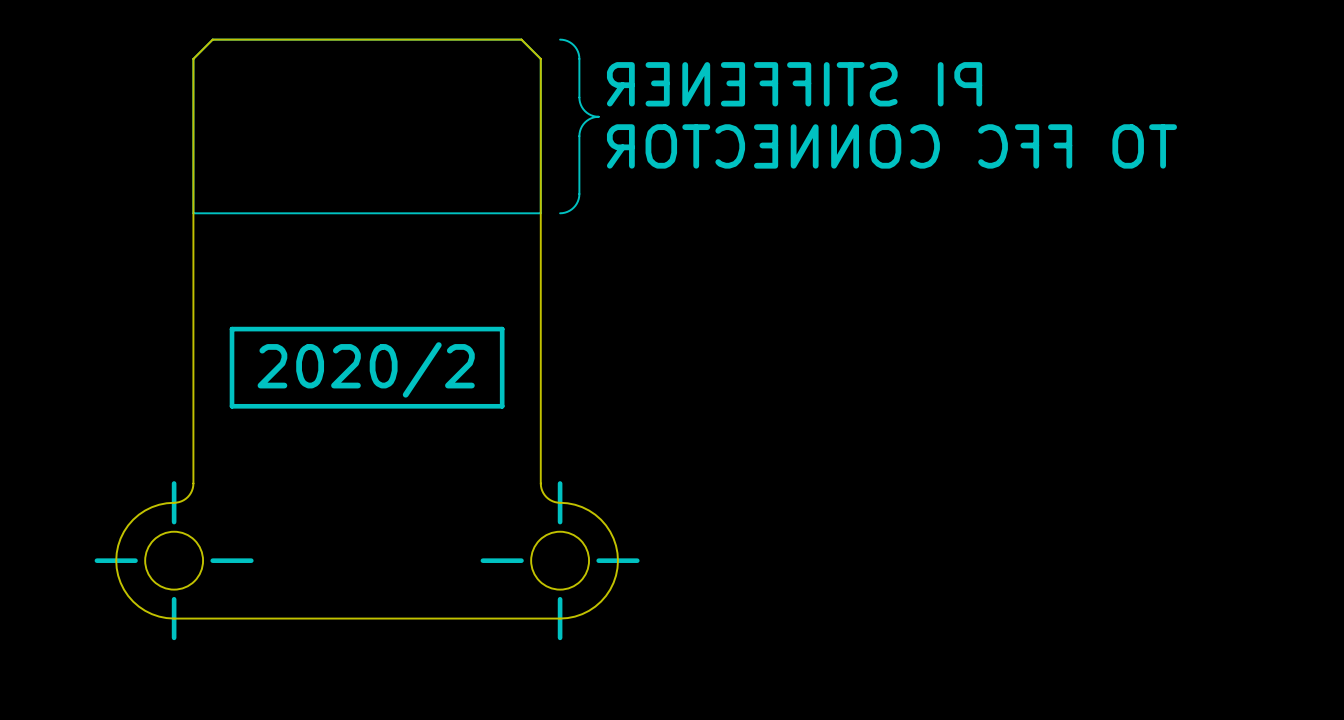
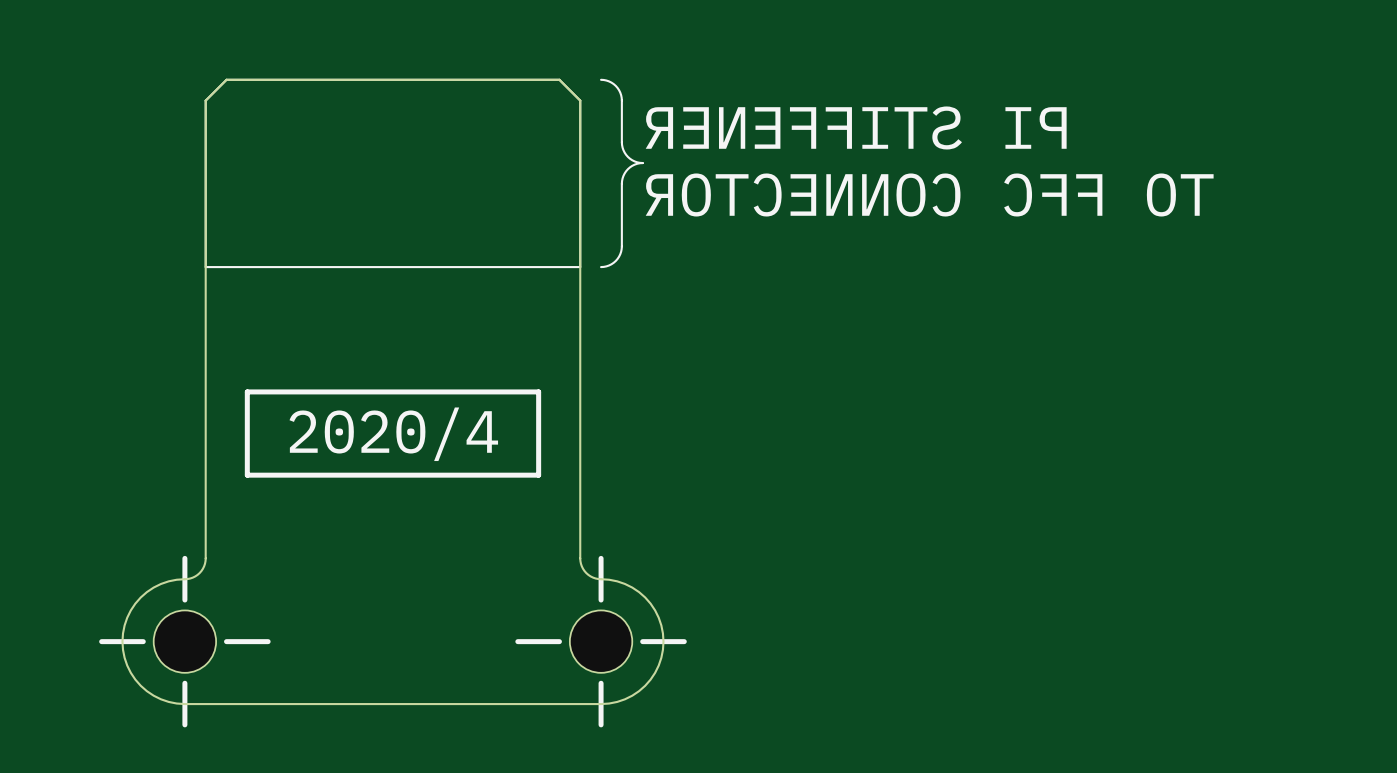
text: 2020/2 (366, 369) -> 2020/4 (393, 434)

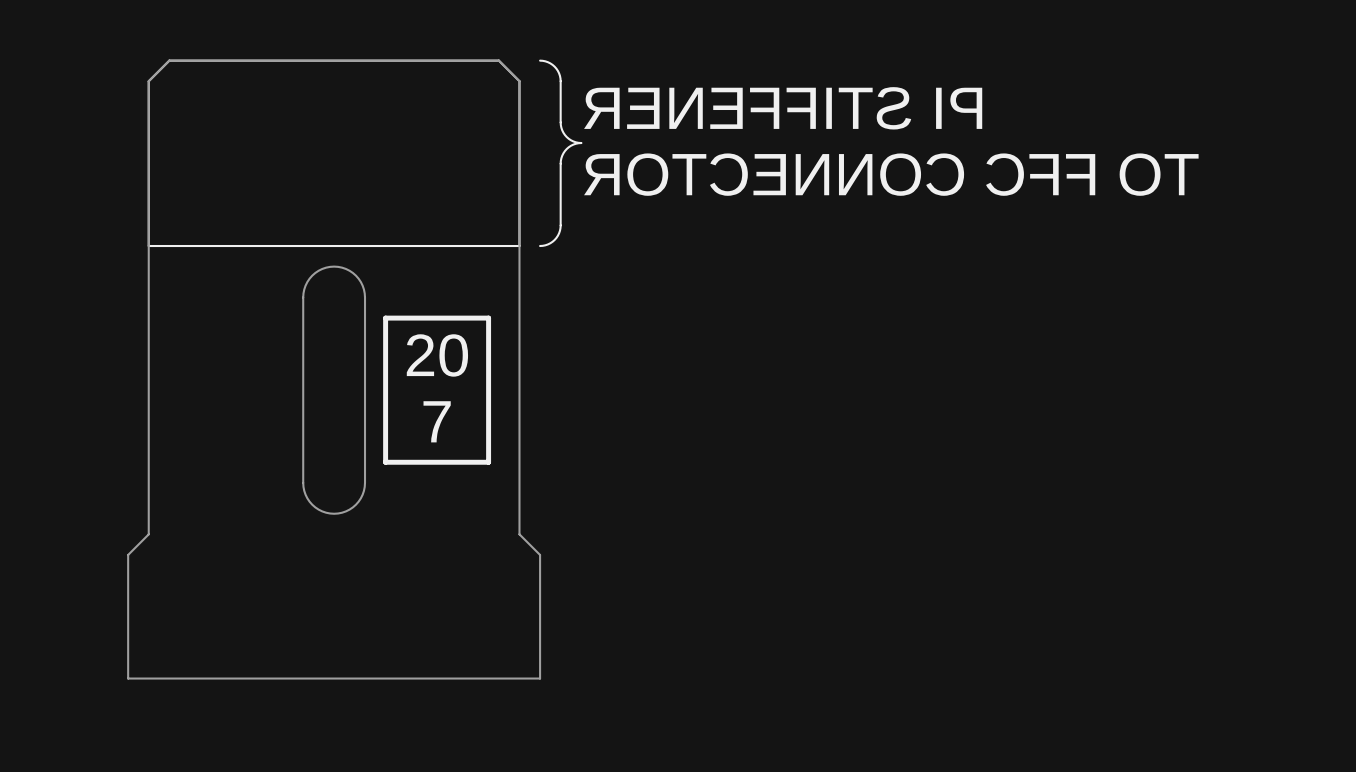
board edge: none -> (365, 297) (364, 486) (360, 498) (352, 507) (342, 512) (330, 513) (322, 511) (312, 504) (305, 494) (303, 486) (303, 293) (307, 282) (315, 272) (326, 267) (338, 266) (345, 268) (355, 275) (362, 285) (365, 297)
line: none -> (488, 318) (488, 462) (385, 462) (385, 318) (488, 318)
text: none -> 20 (437, 355)
line: (538, 391) (538, 475) (247, 475) (247, 391) (538, 391) -> none
text: 2020/4 (393, 434) -> none
text: none -> 7 (437, 421)
board edge: (205, 558) (202, 568) (195, 576) (161, 583) (140, 597) (130, 610) (123, 633) (124, 657) (135, 679) (146, 691) (161, 699) (184, 704) -> (148, 534) (128, 554) (128, 678)
board edge: (580, 558) (583, 568) (590, 576) (624, 583) (645, 597) (655, 610) (662, 633) (661, 657) (650, 679) (639, 691) (624, 699) (601, 704) -> (519, 534) (540, 554) (540, 678)
part: (184, 641) -> none
part: (601, 641) -> none

